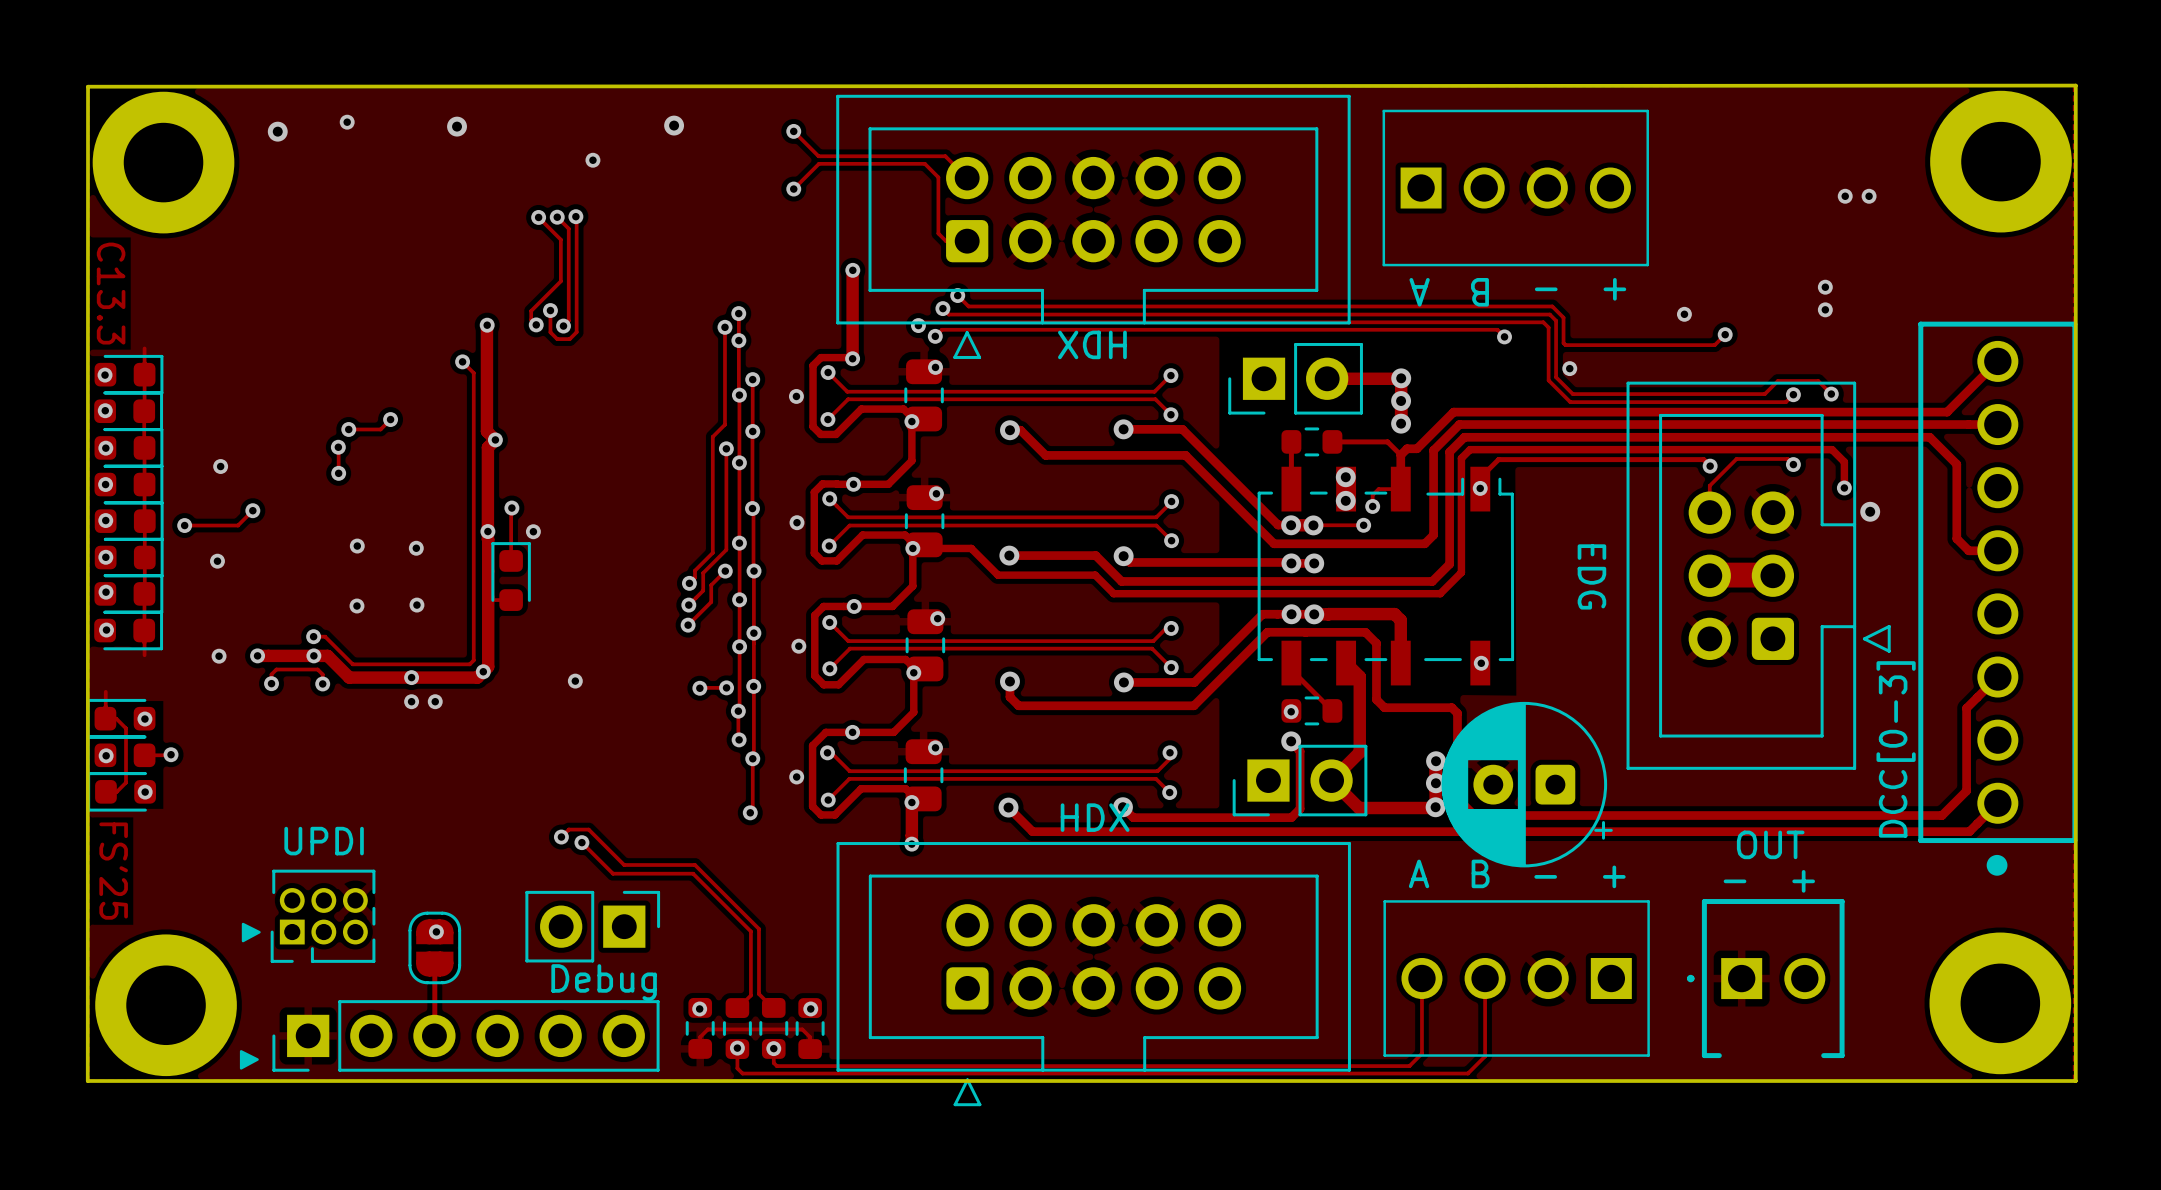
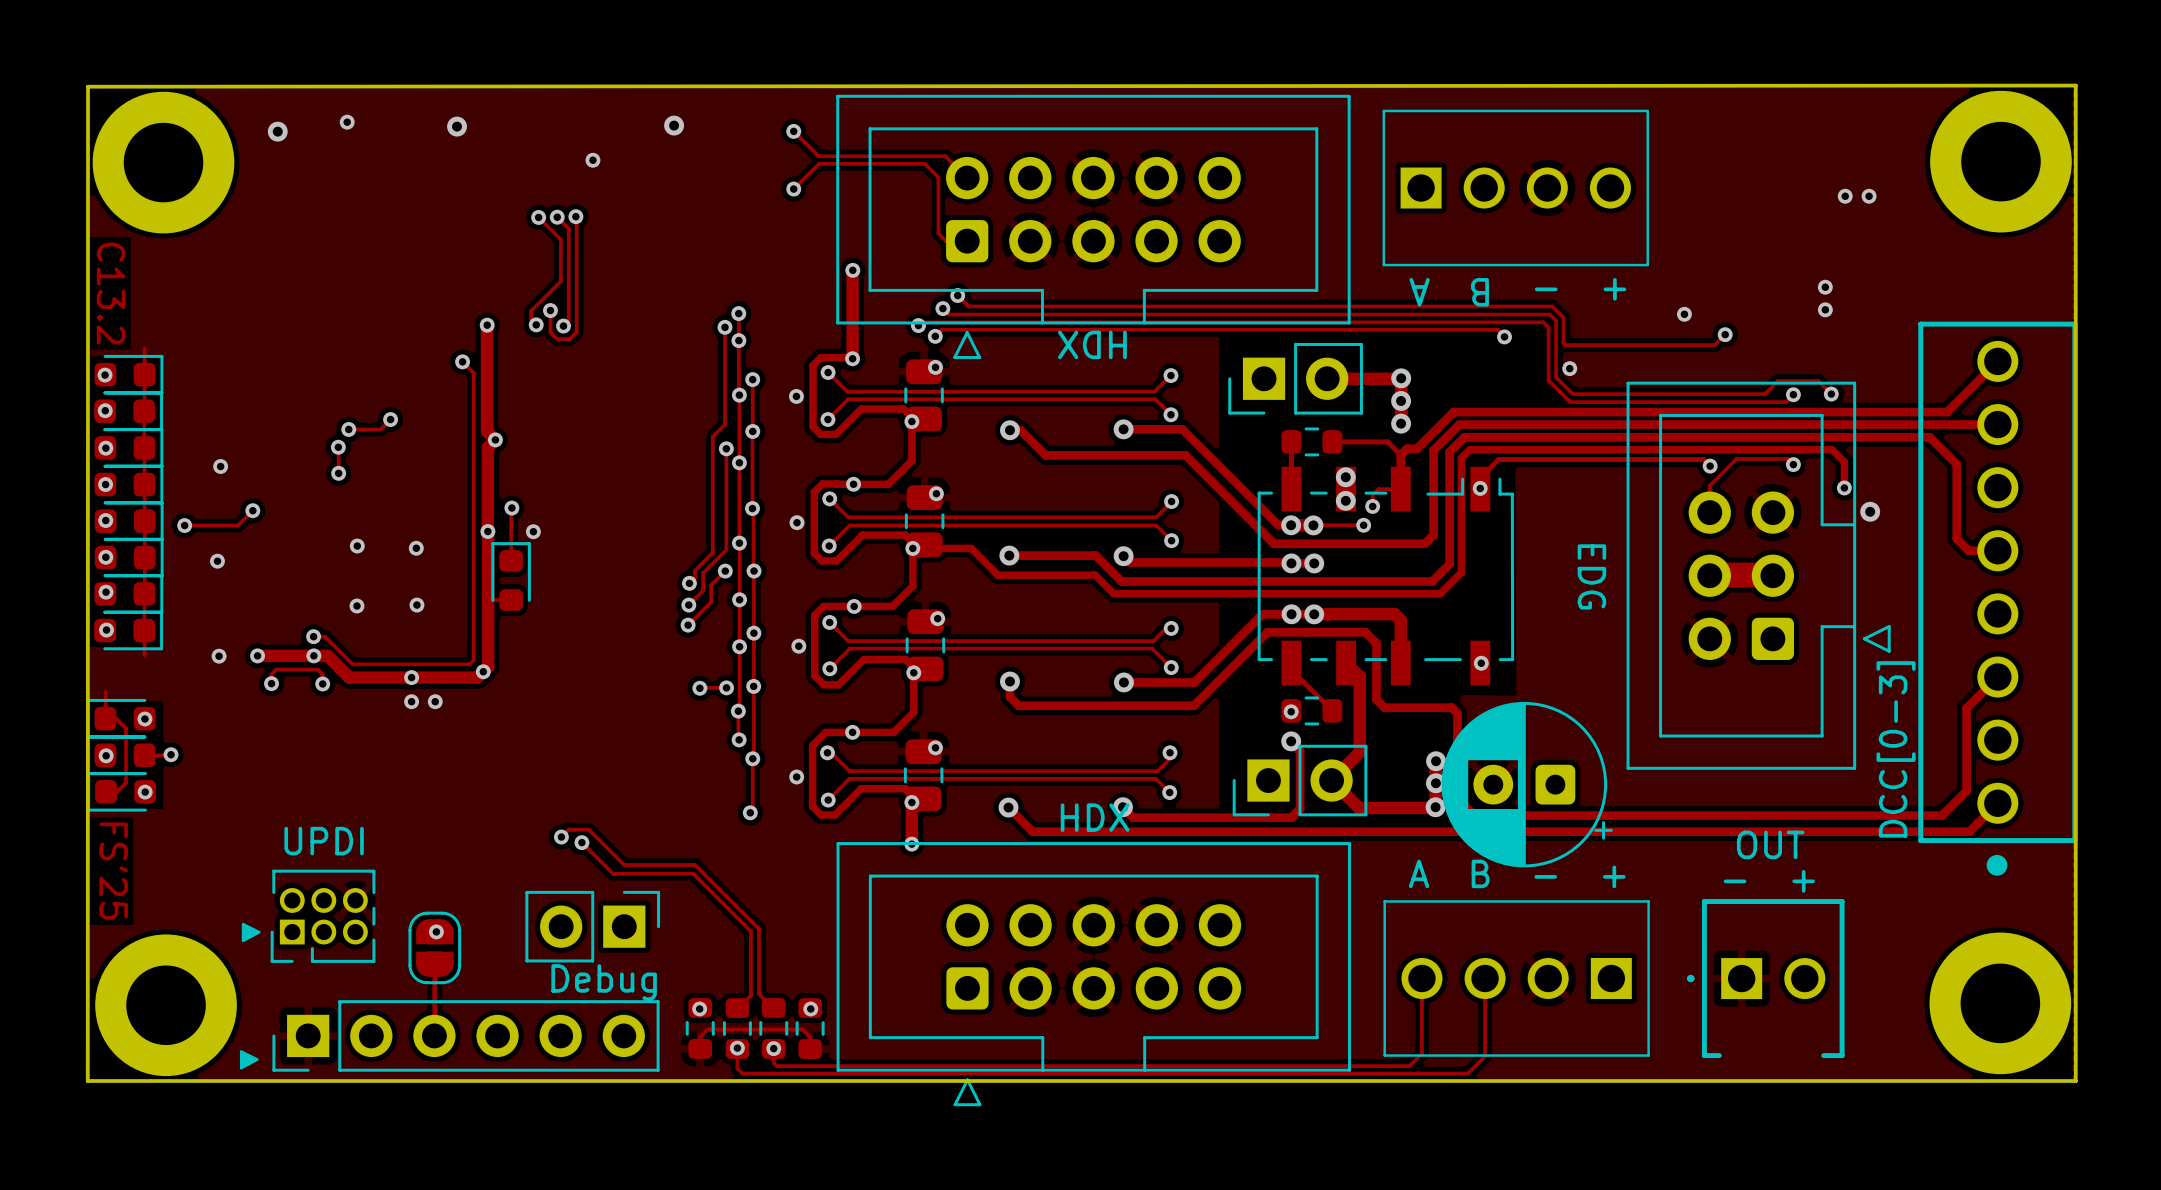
text: C13.3 (111, 293) -> C13.2 (111, 293)
via: (575, 681) -> none

